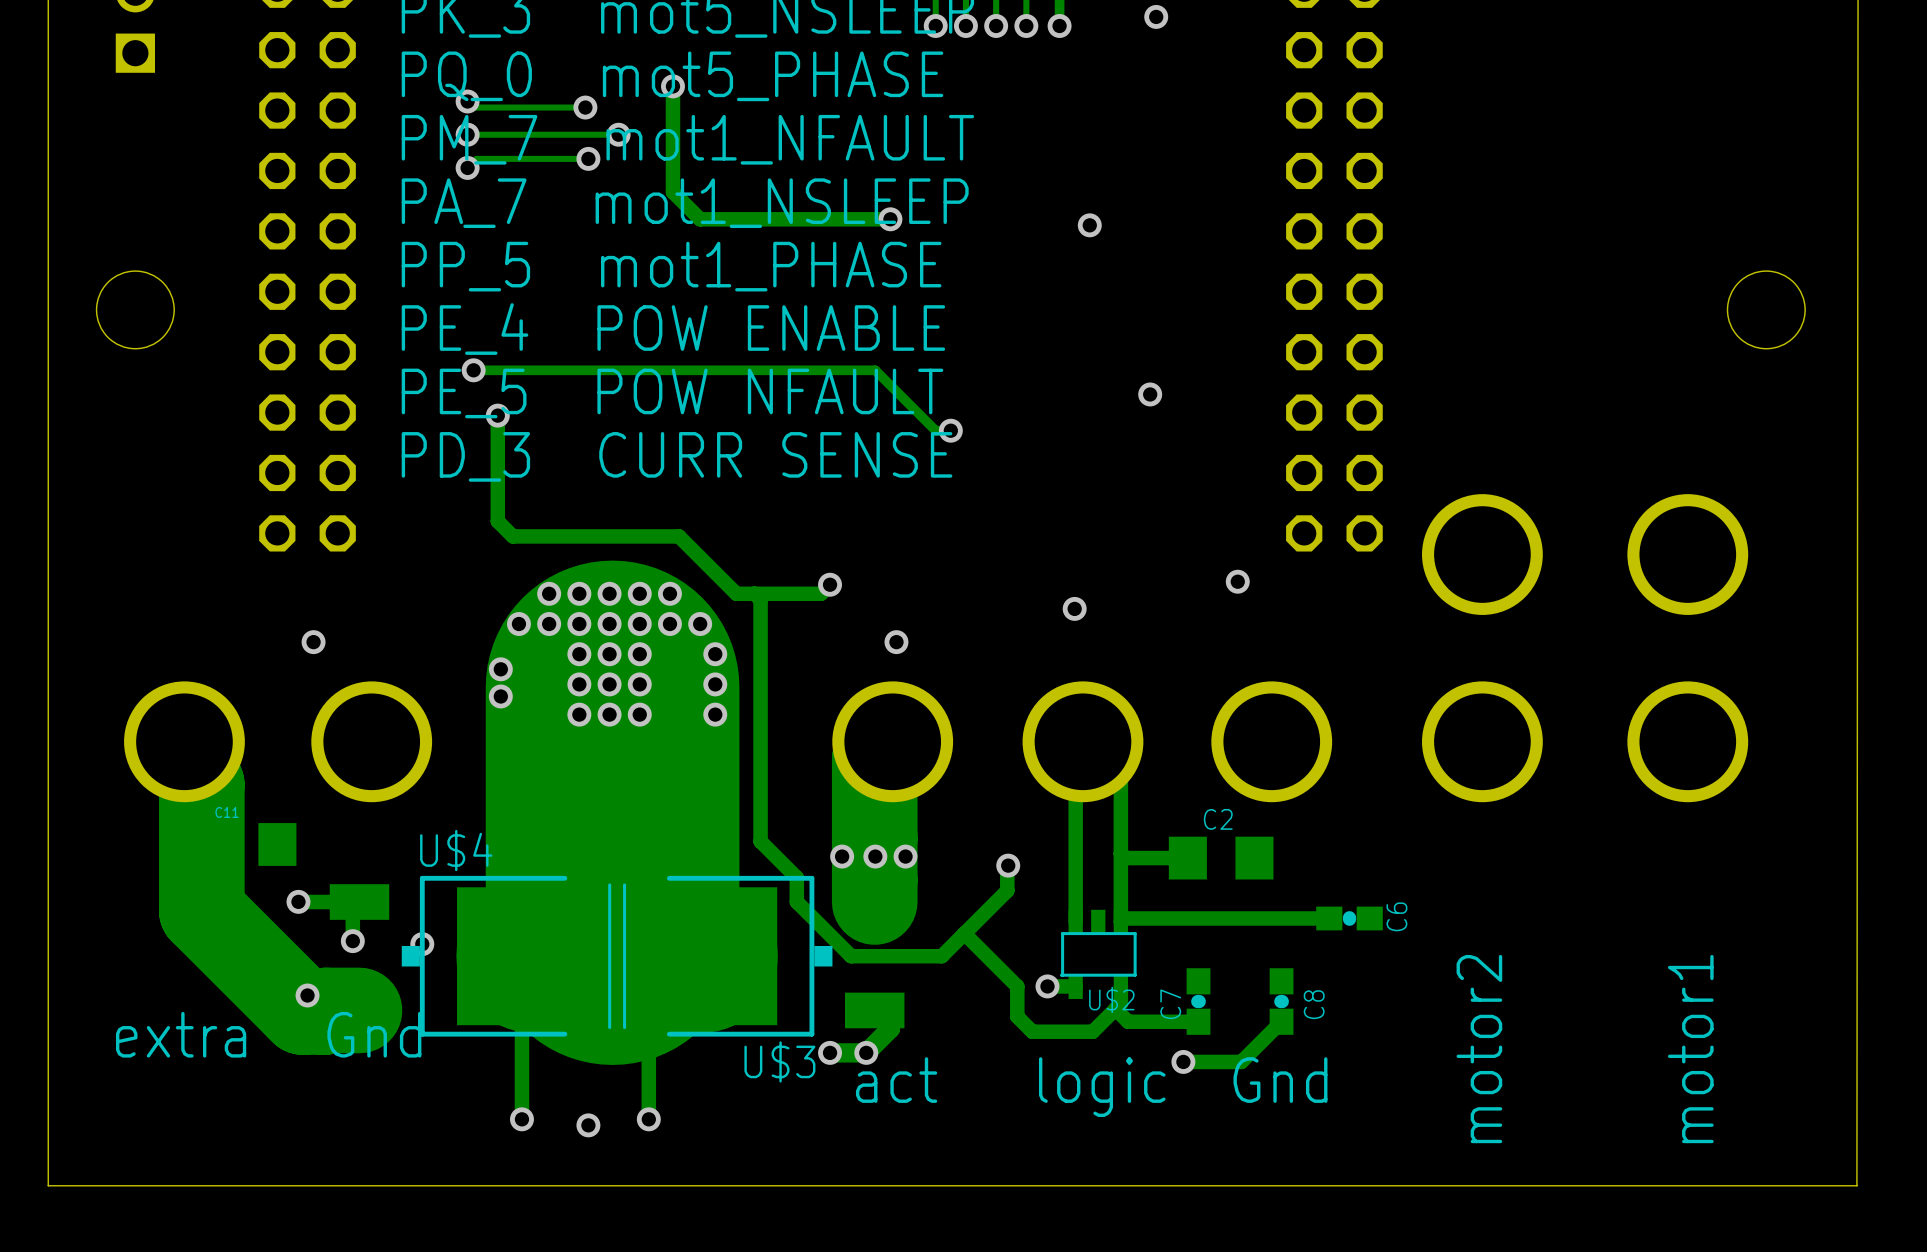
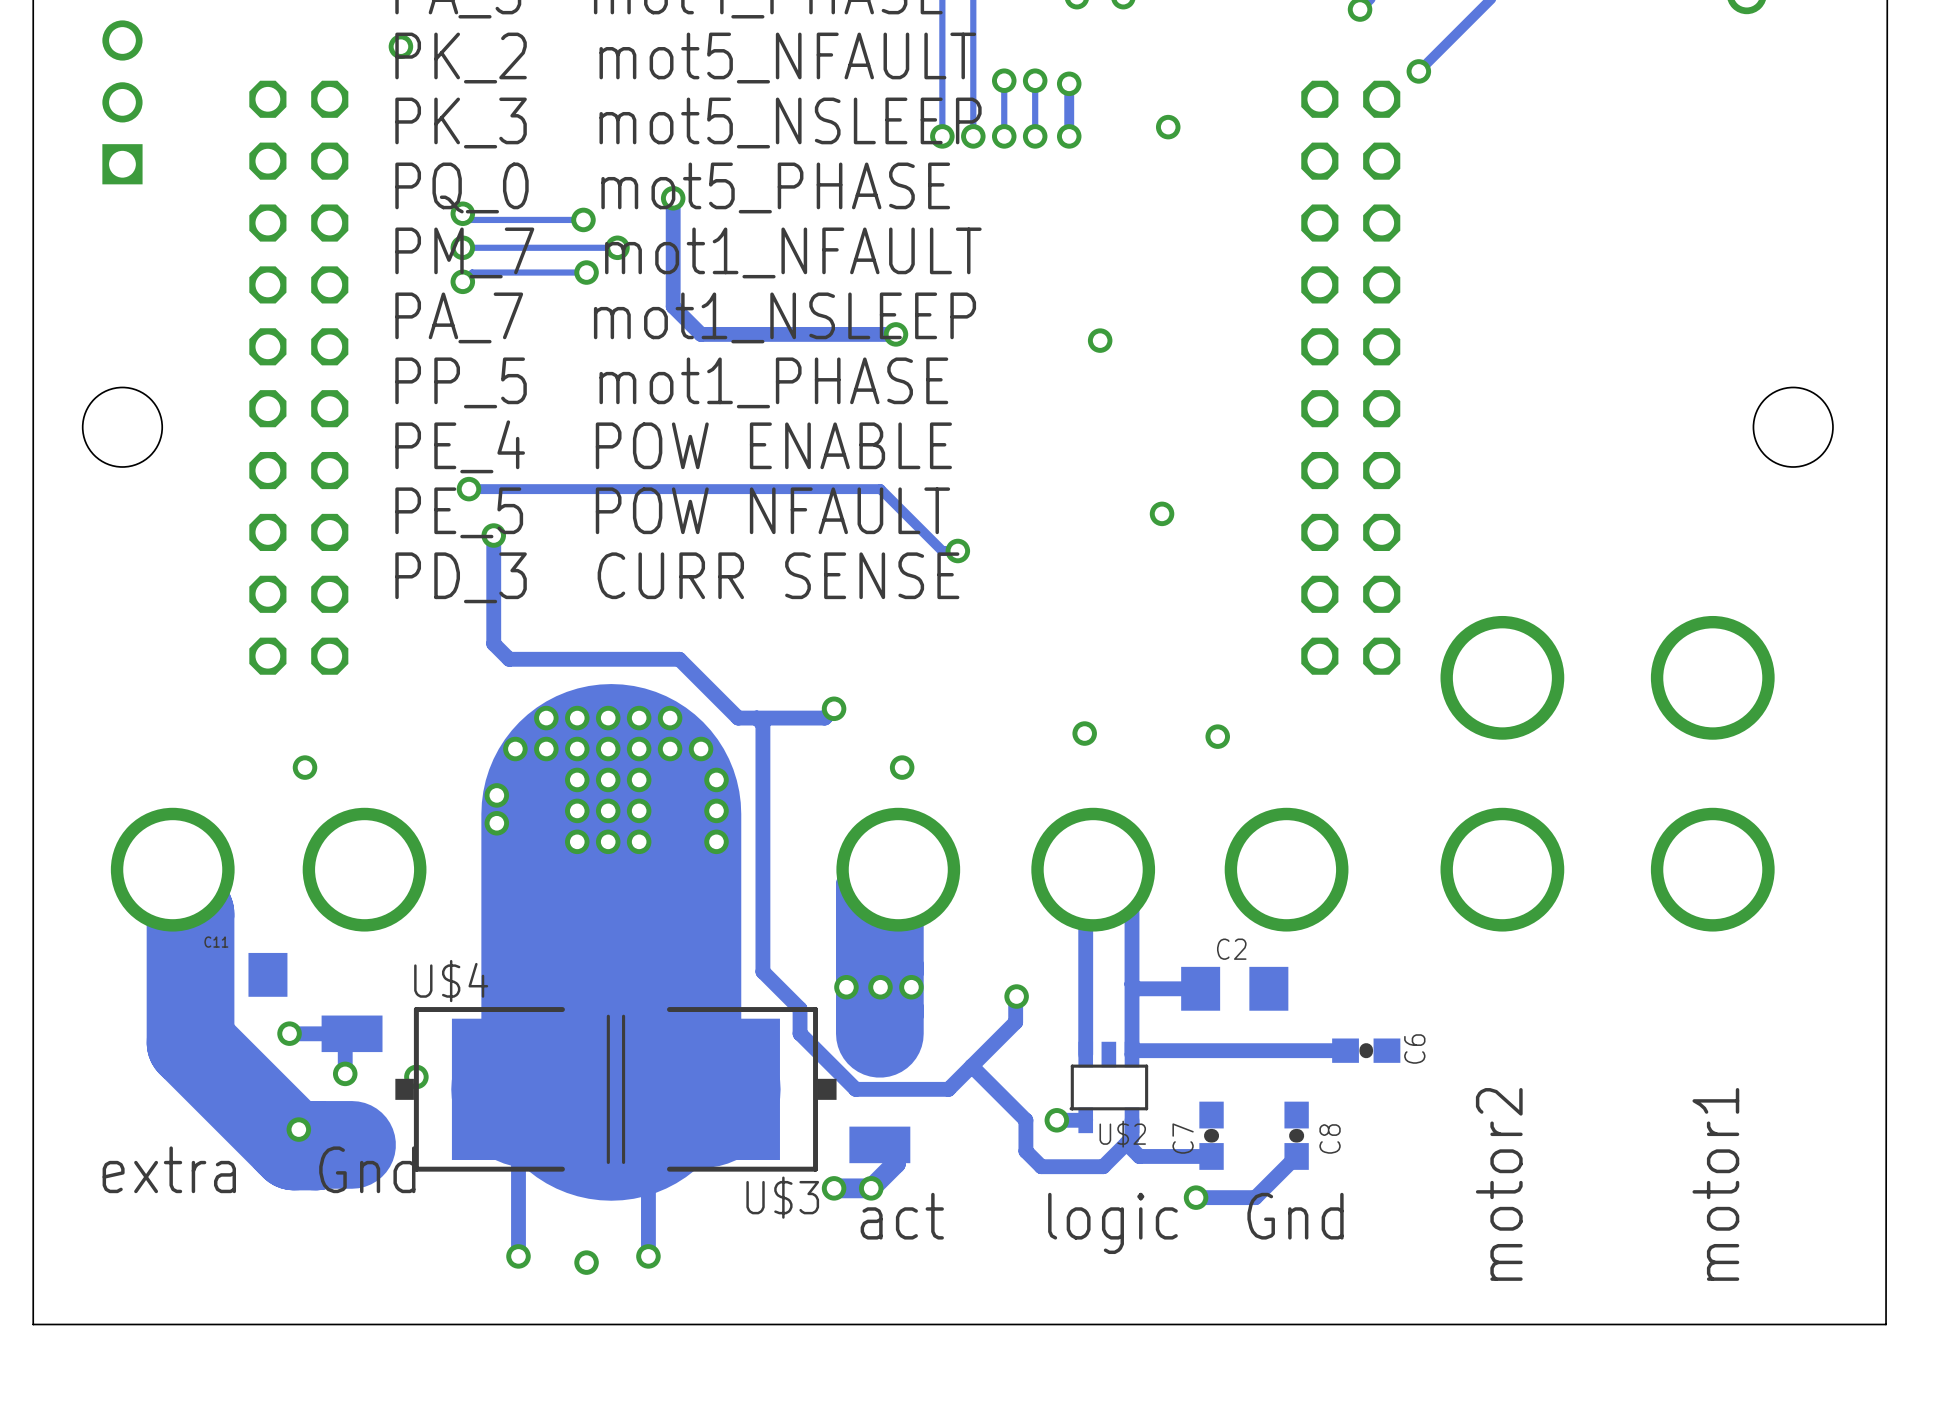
via position: (1237, 581) -> (1217, 736)

